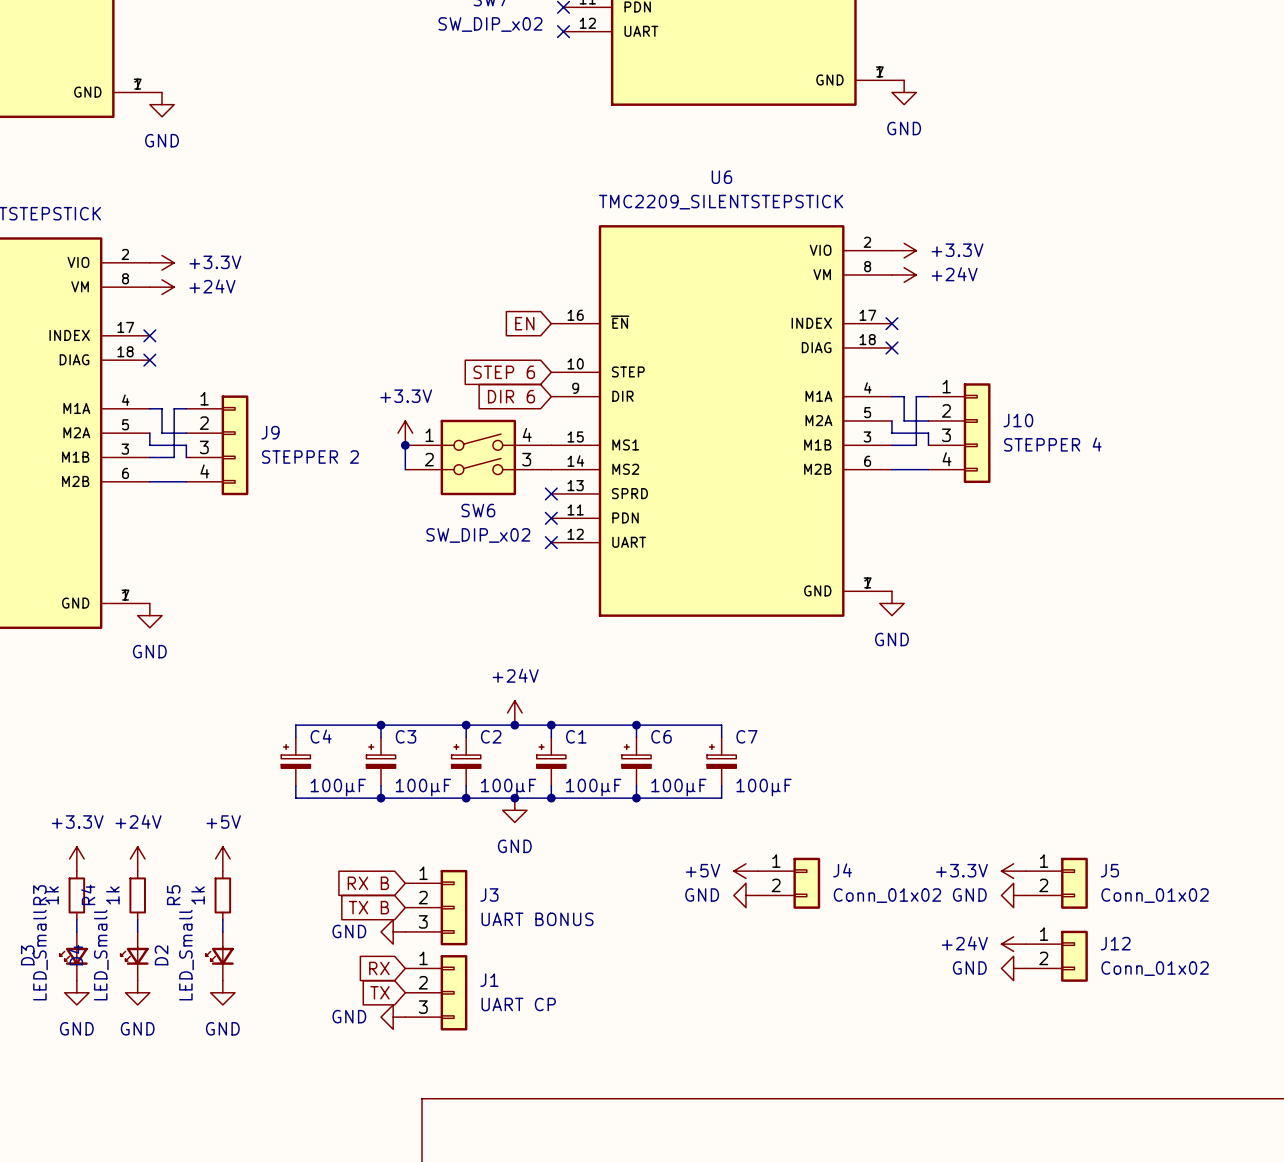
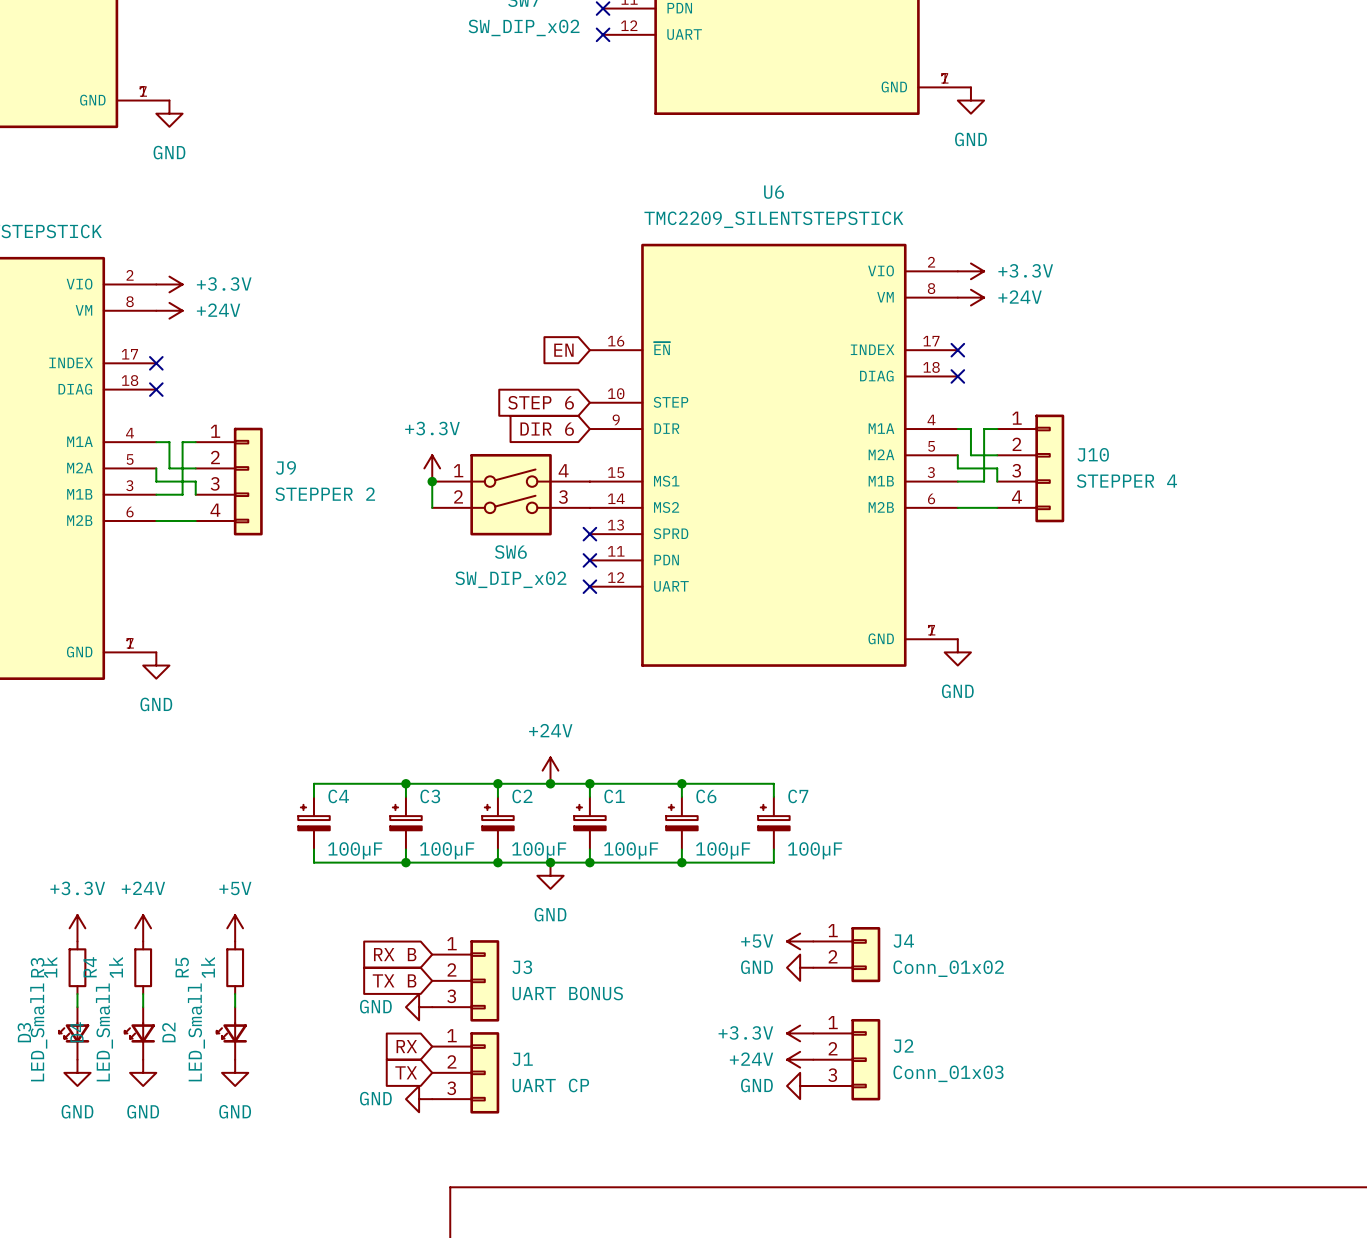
power symbol: +3.3V (1013, 871) -> none
J5: Conn_01x02 (1056, 883) -> none
power symbol: GND (1013, 895) -> none
power symbol: +24V (1013, 944) -> none
power symbol: none -> +3.3V (800, 1033)
J12: Conn_01x02 (1056, 956) -> none
power symbol: GND (1013, 968) -> none
power symbol: none -> +24V (800, 1059)
J2: none -> Conn_01x03 (846, 1059)
power symbol: none -> GND (800, 1085)

